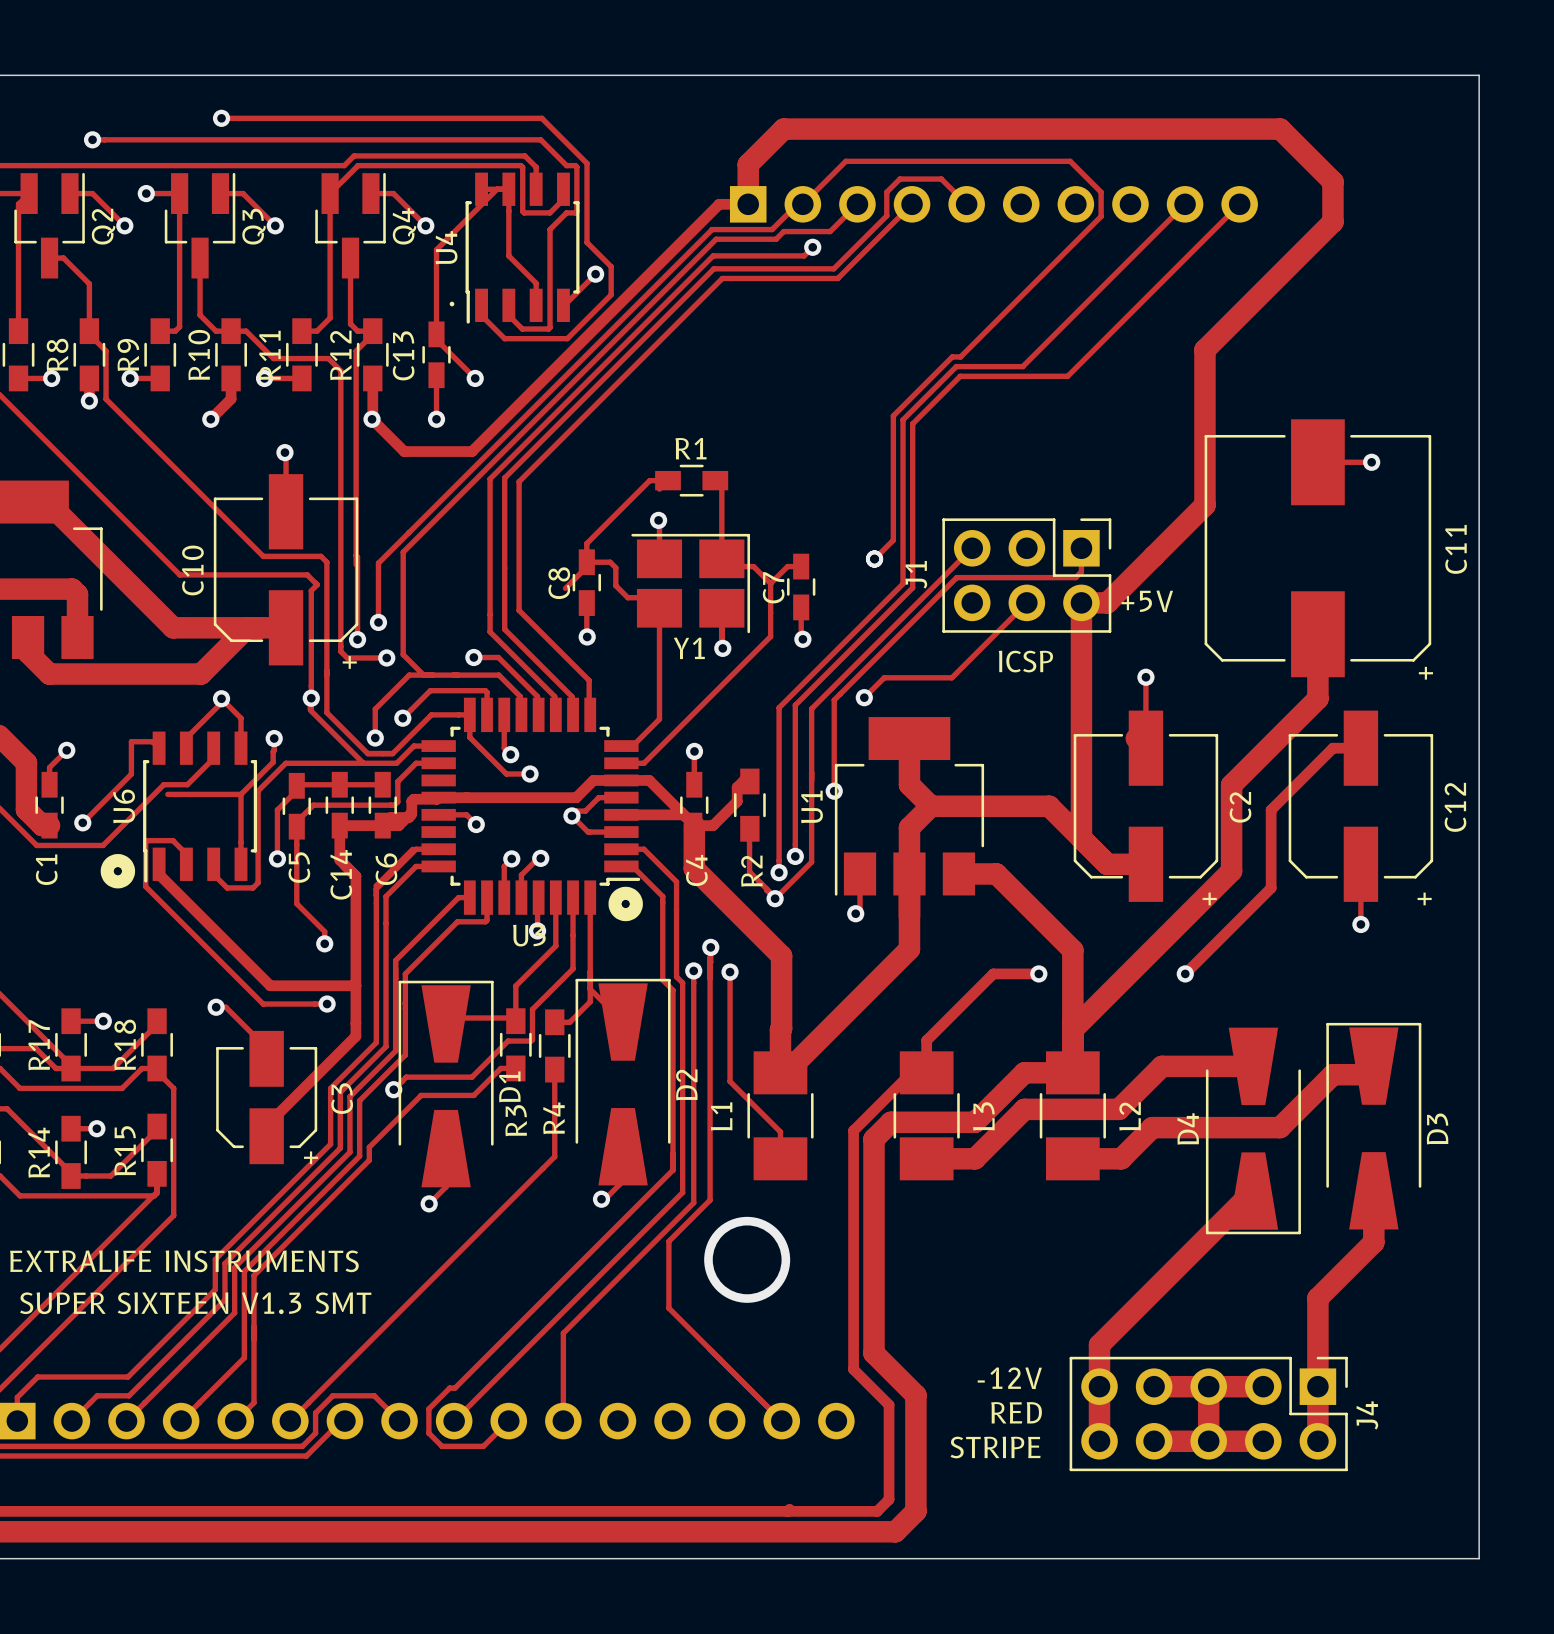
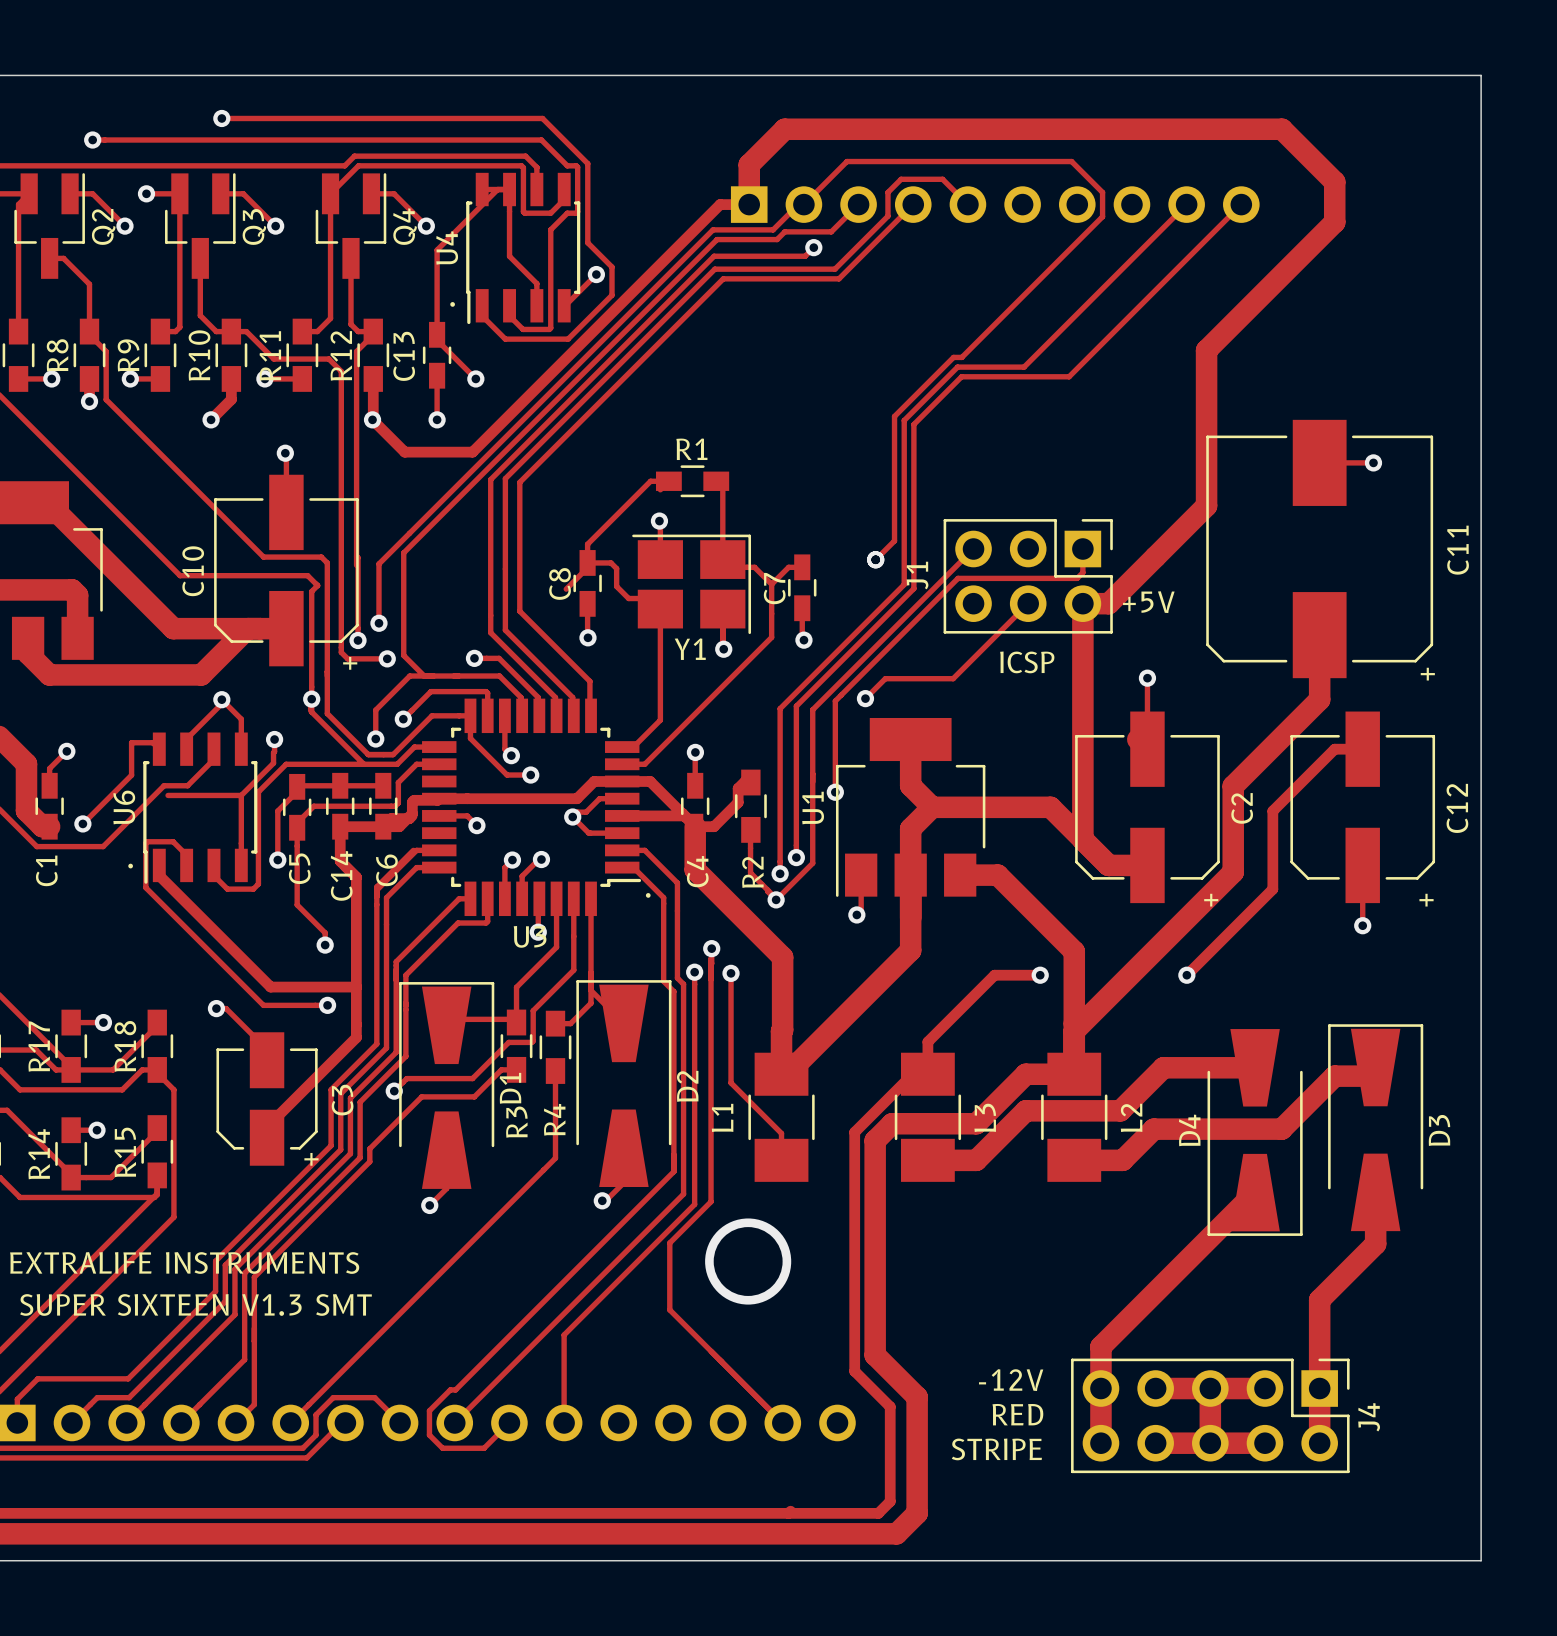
drawing: [100, 854, 136, 889] -> none
text: none -> . (130, 866)
drawing: [608, 886, 643, 922] -> none
text: none -> . (648, 895)

